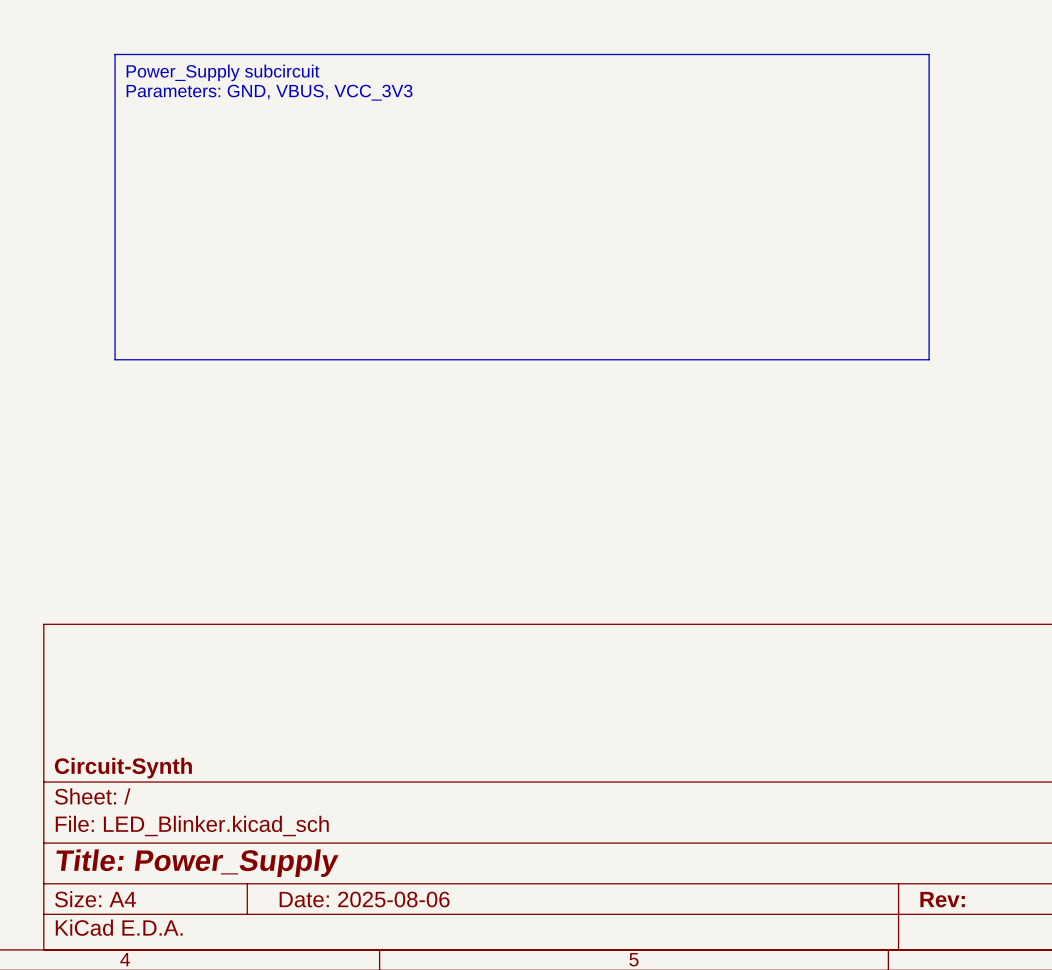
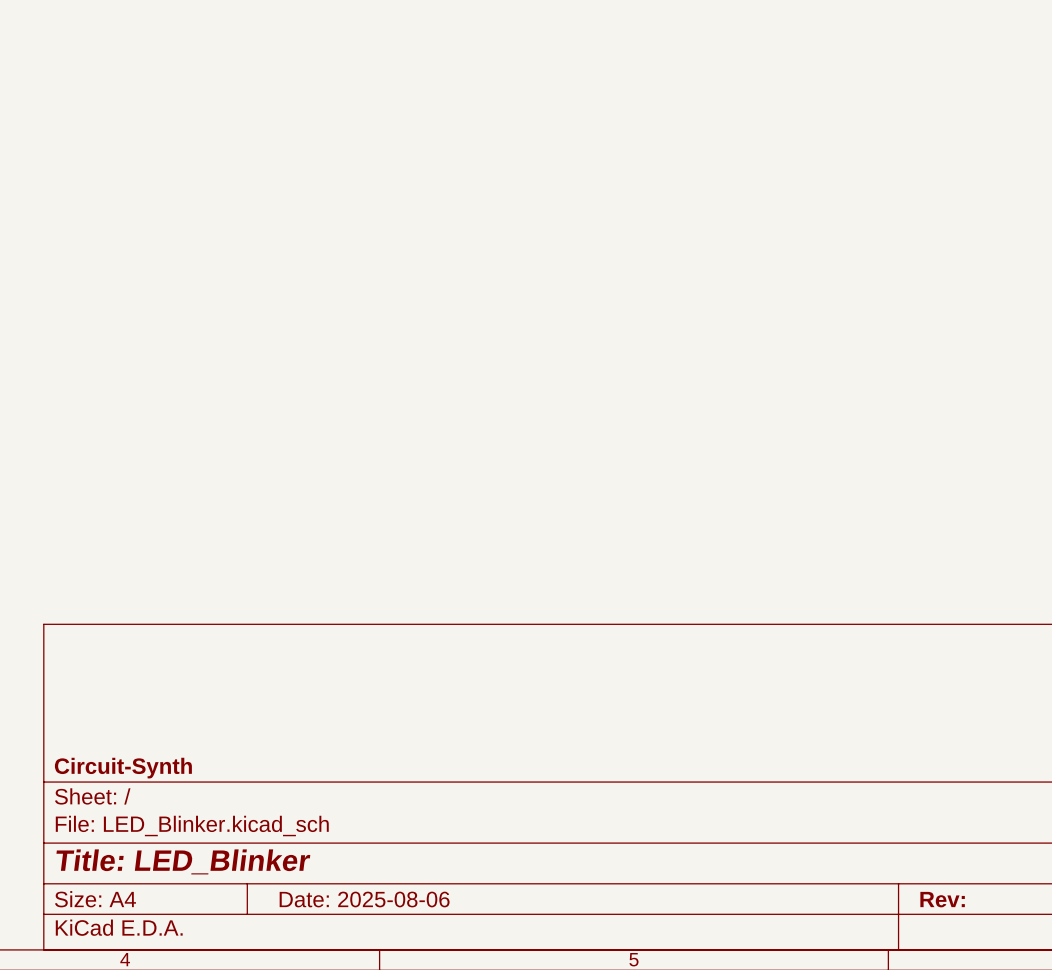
line: (115, 54) (929, 54) (929, 359) (115, 359) (115, 54) -> none
text: Power_Supply subcircuit (223, 72) -> none
text: Parameters: GND, VBUS, VCC_3V3 (269, 92) -> none
title block: Title: Power_Supply (197, 863) -> Title: LED_Blinker (183, 861)

